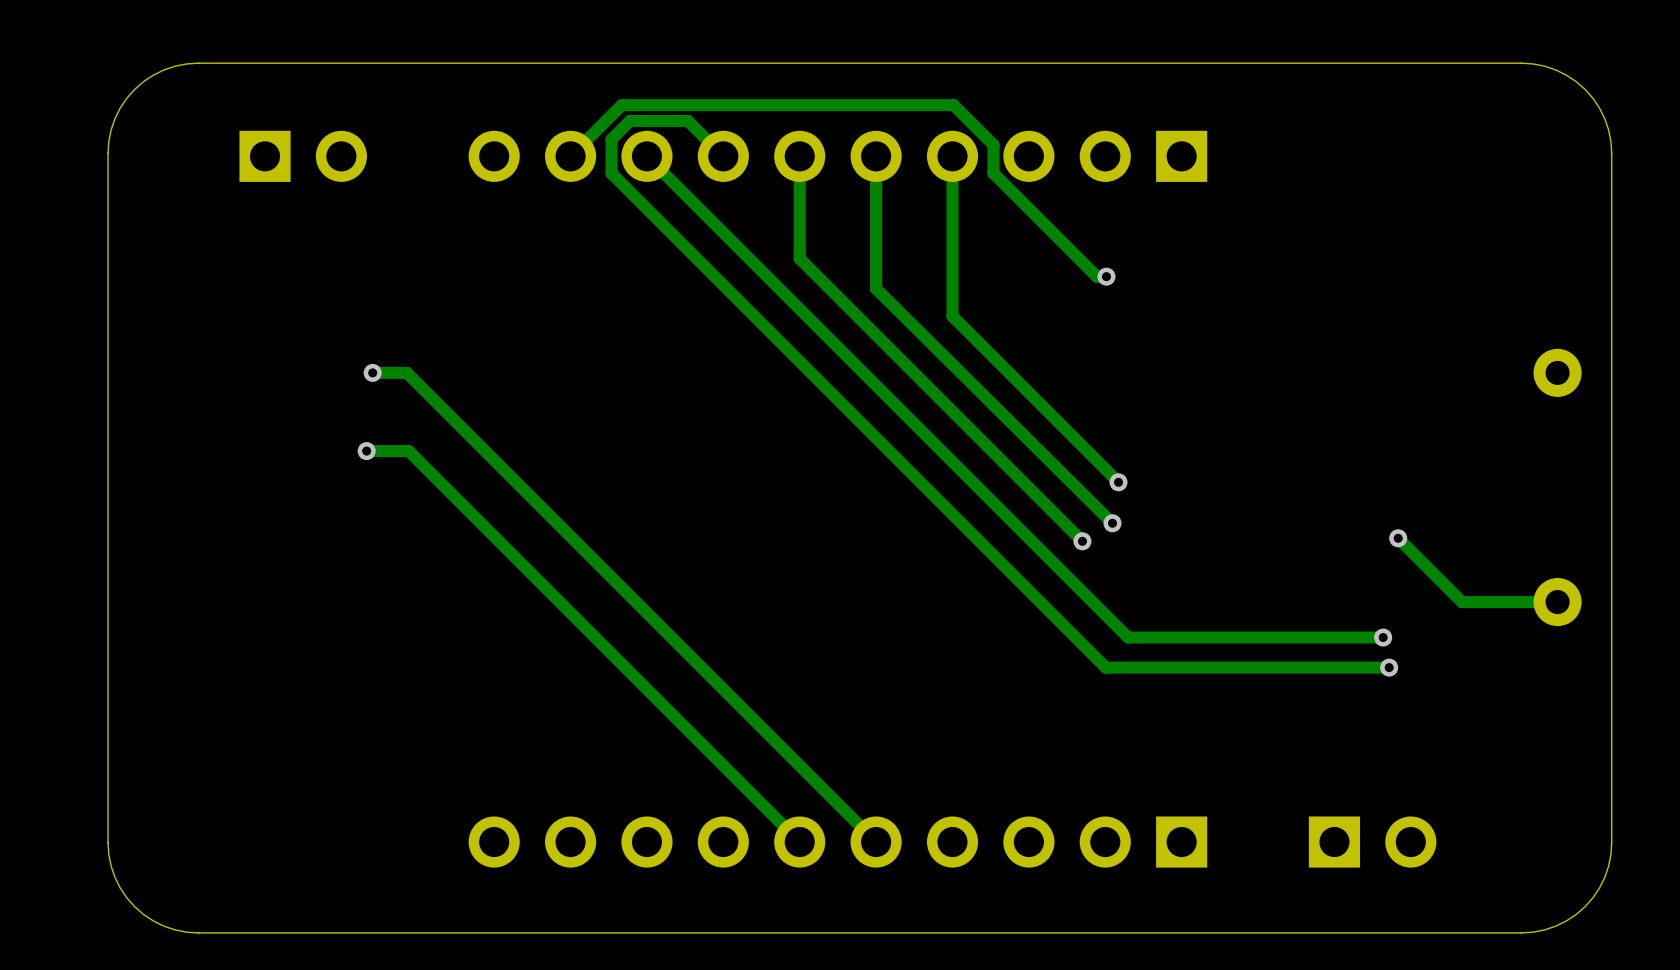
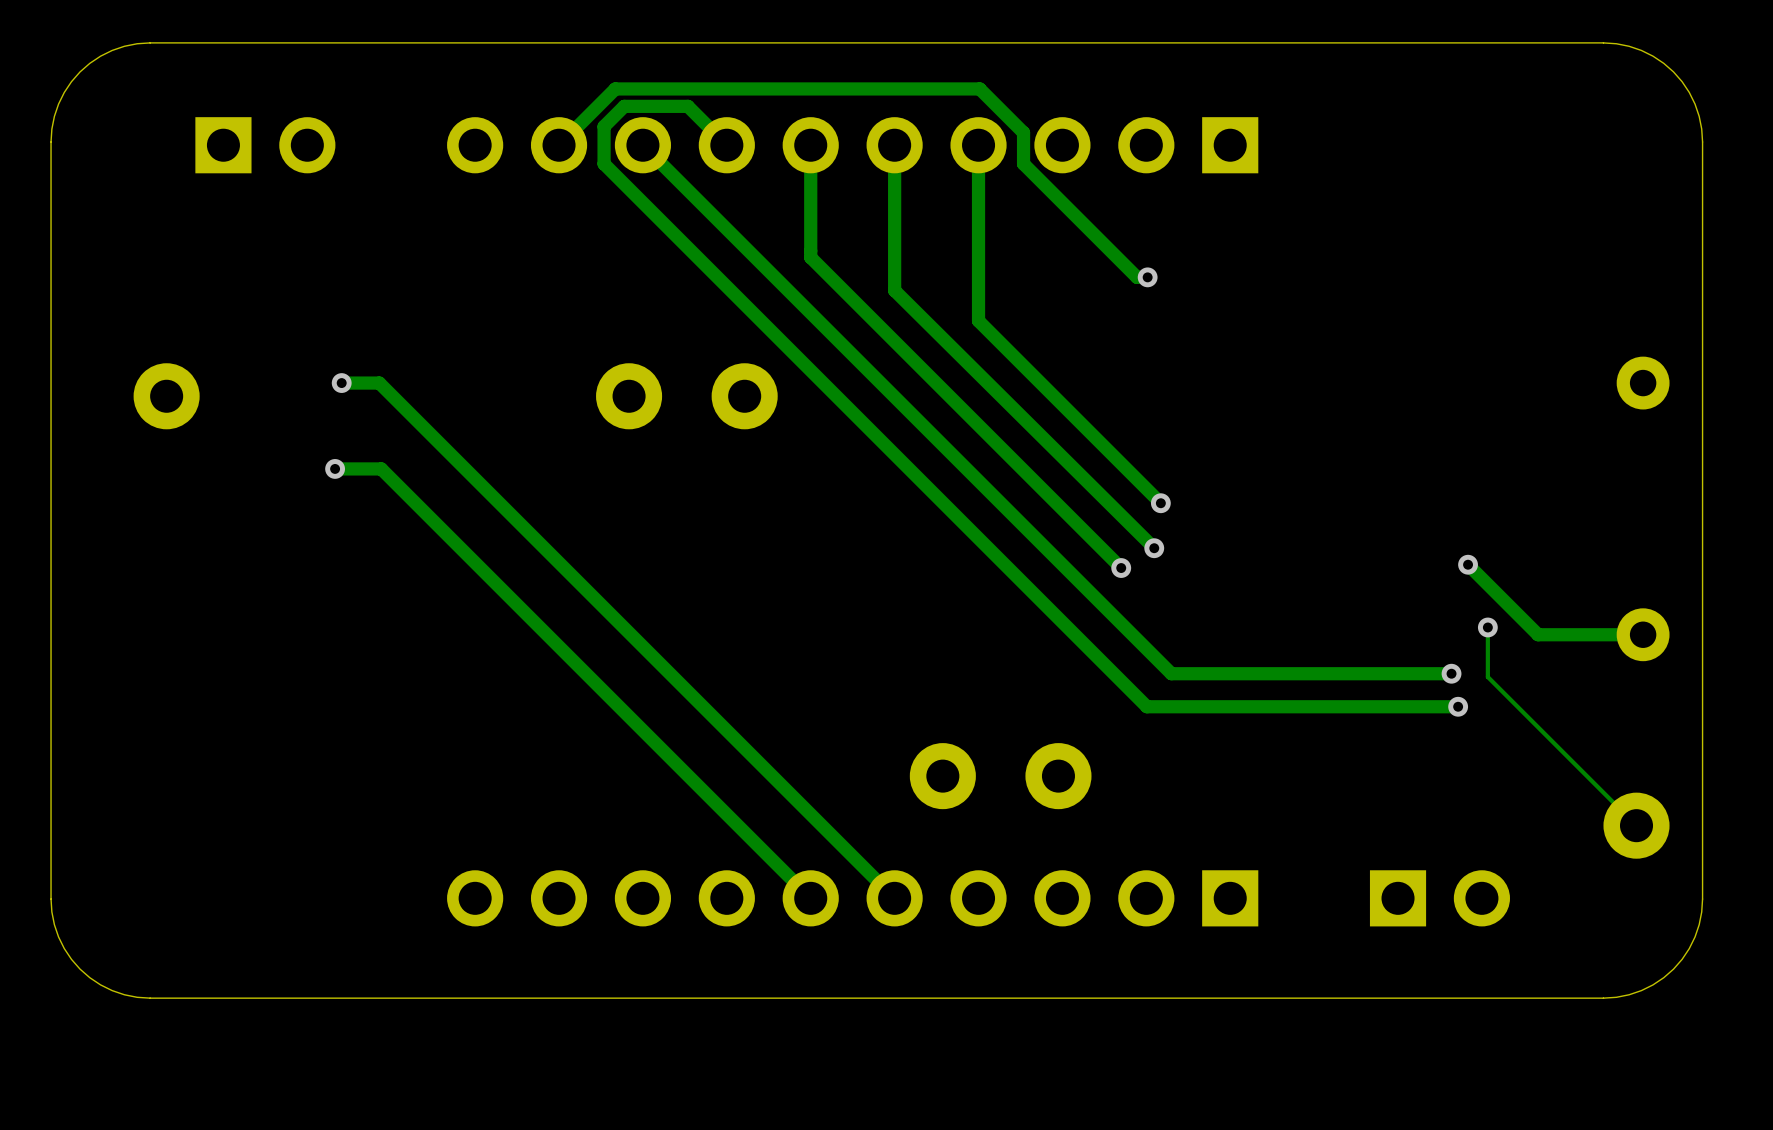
part: none -> (166, 396)
part: none -> (629, 396)
part: none -> (744, 396)
track: none -> (1487, 627) (1487, 677) (1636, 825)
via: none -> (1487, 627)
part: none -> (942, 776)
part: none -> (1058, 776)
part: none -> (1636, 825)

